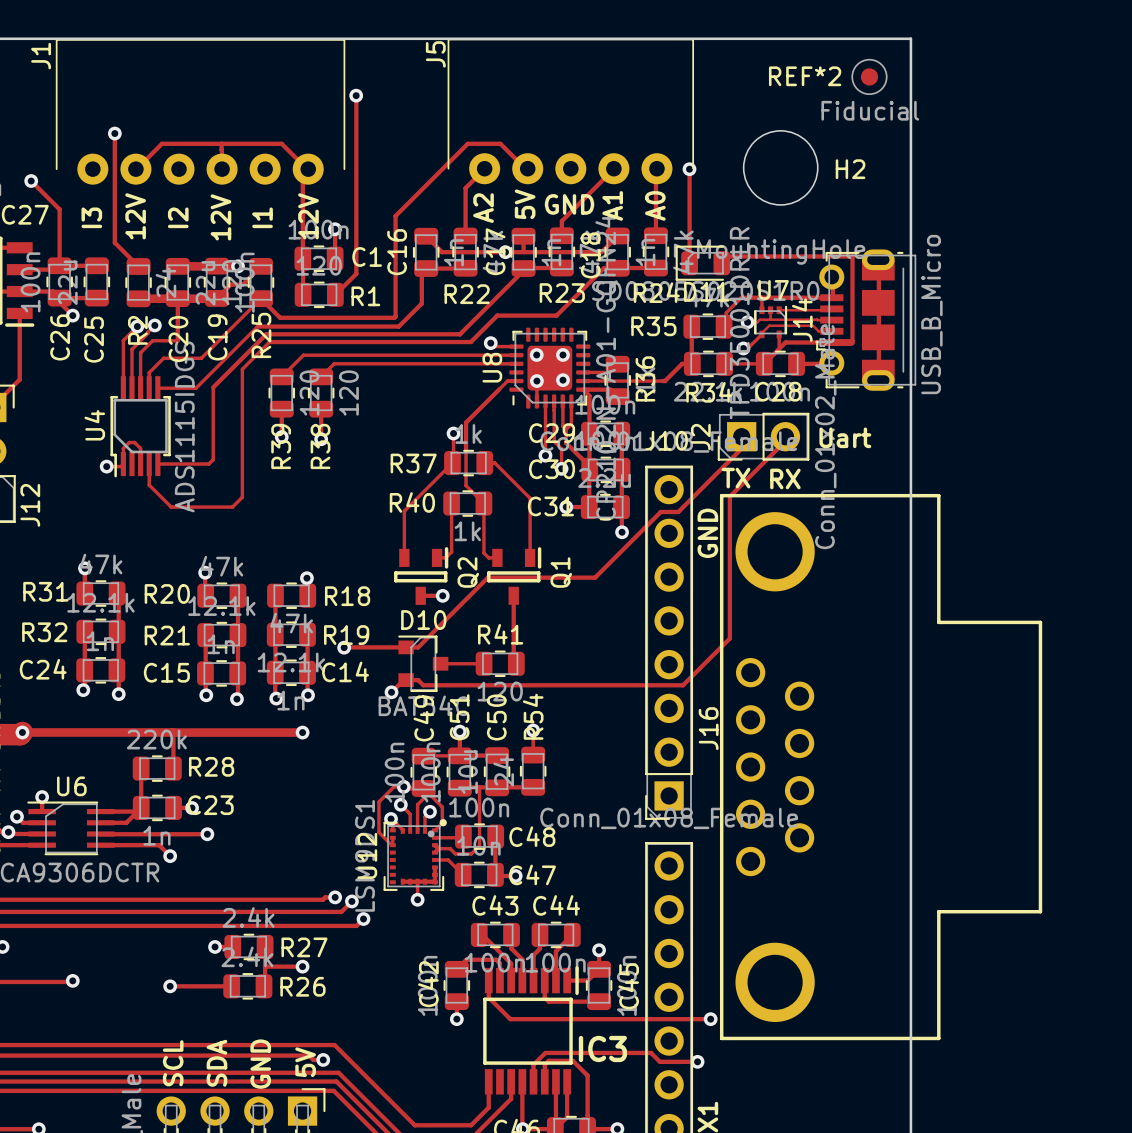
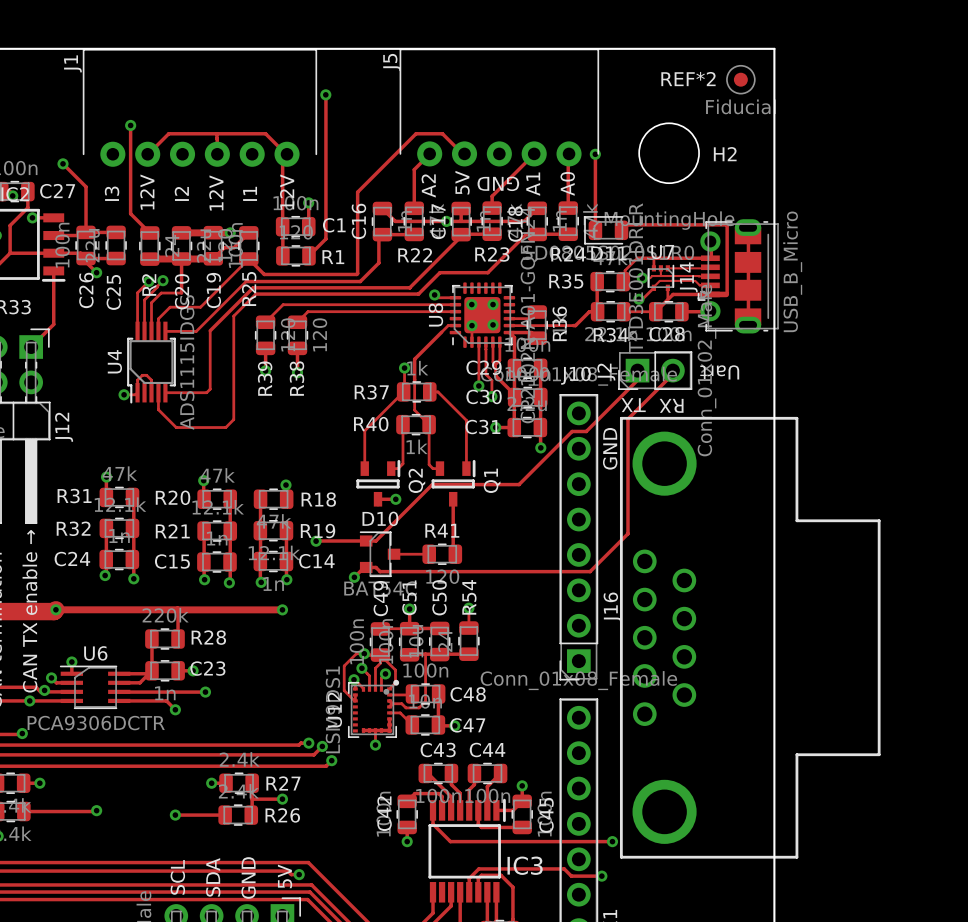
text rotation: 0° (569, 204) -> 180° (498, 183)
text rotation: 0° (845, 437) -> 180° (719, 372)
text rotation: 0° (736, 478) -> 180° (633, 405)
text rotation: 0° (785, 478) -> 180° (671, 405)

